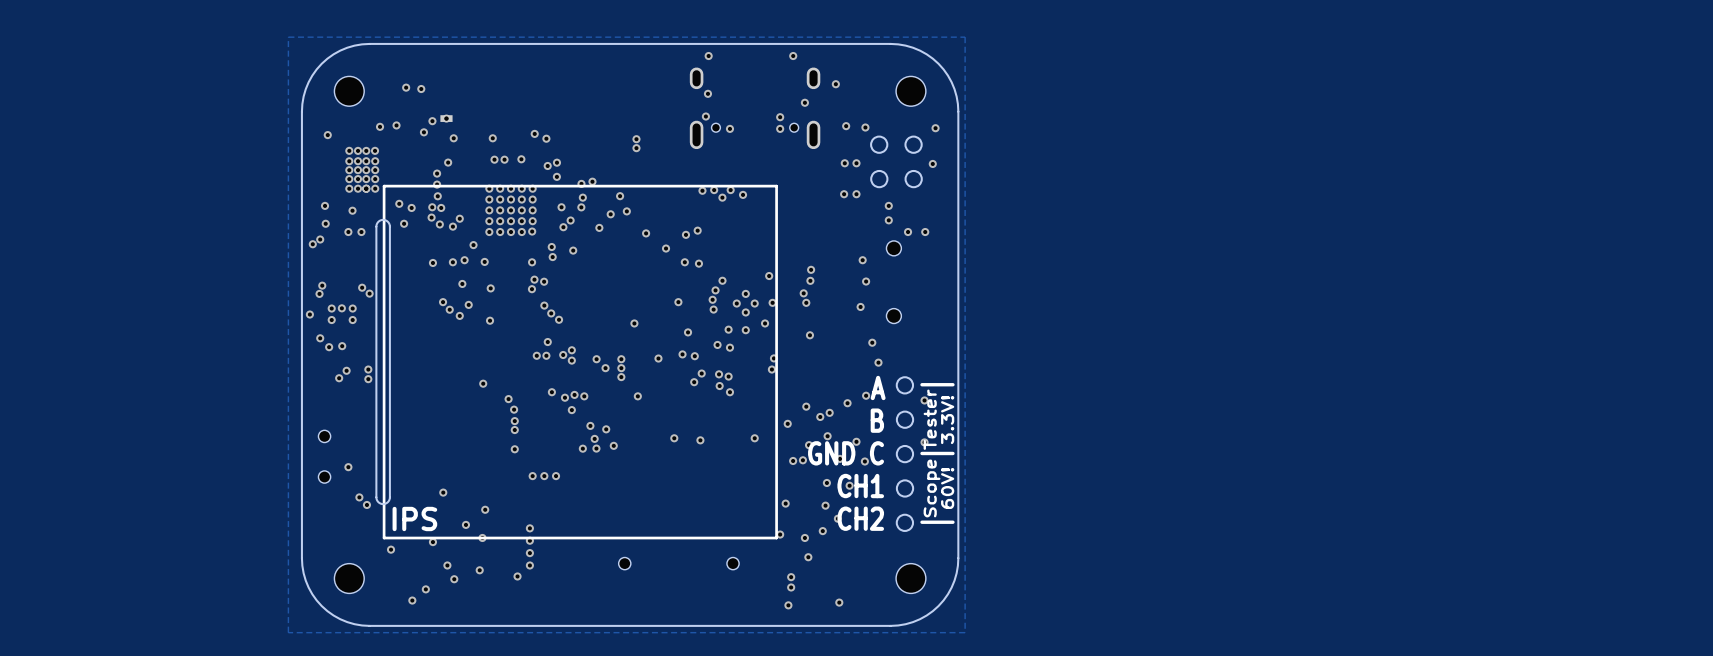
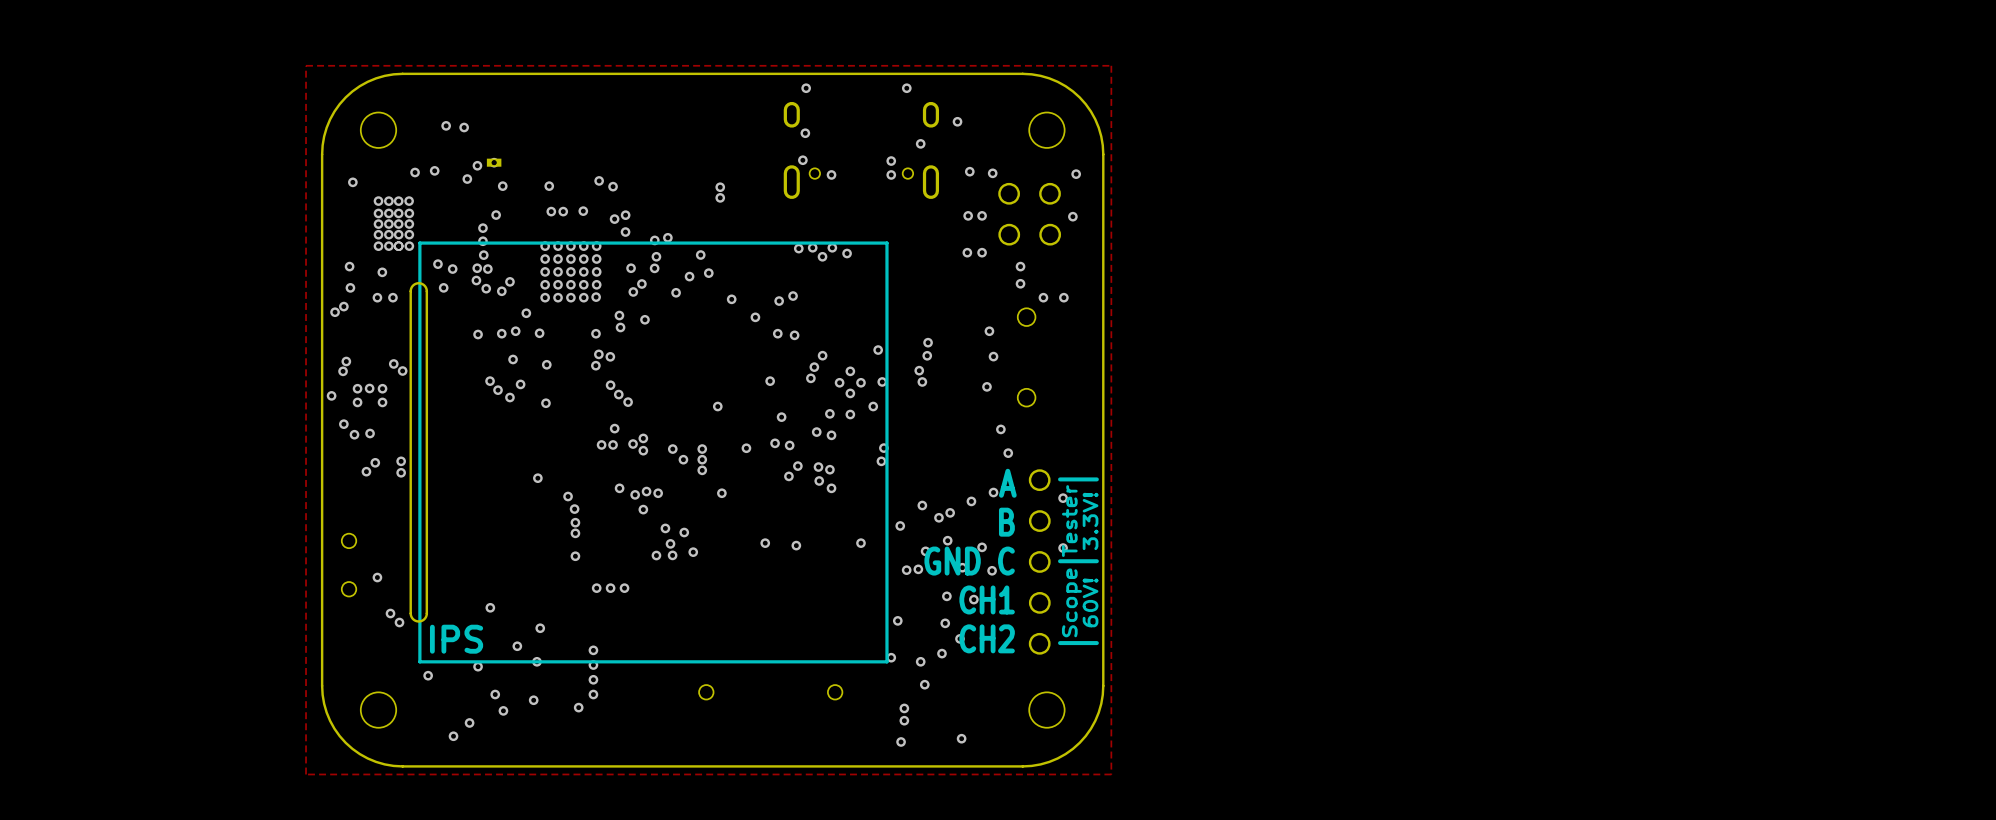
via: (713, 309) -> none
via: (809, 335) -> none

